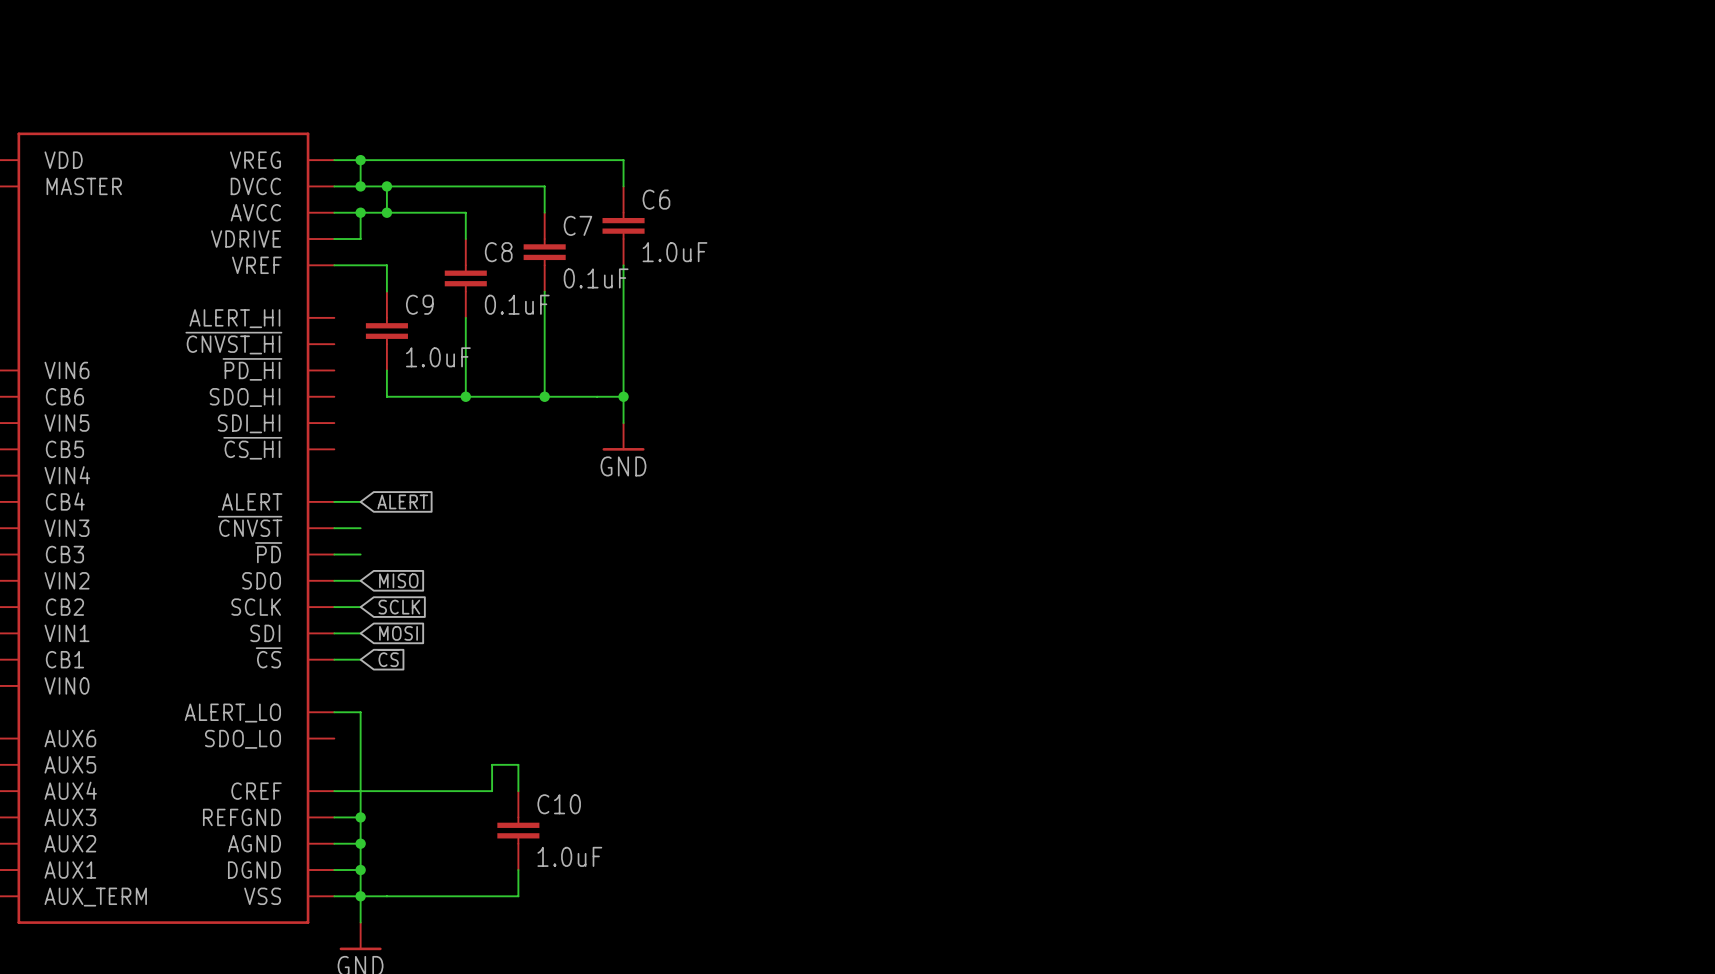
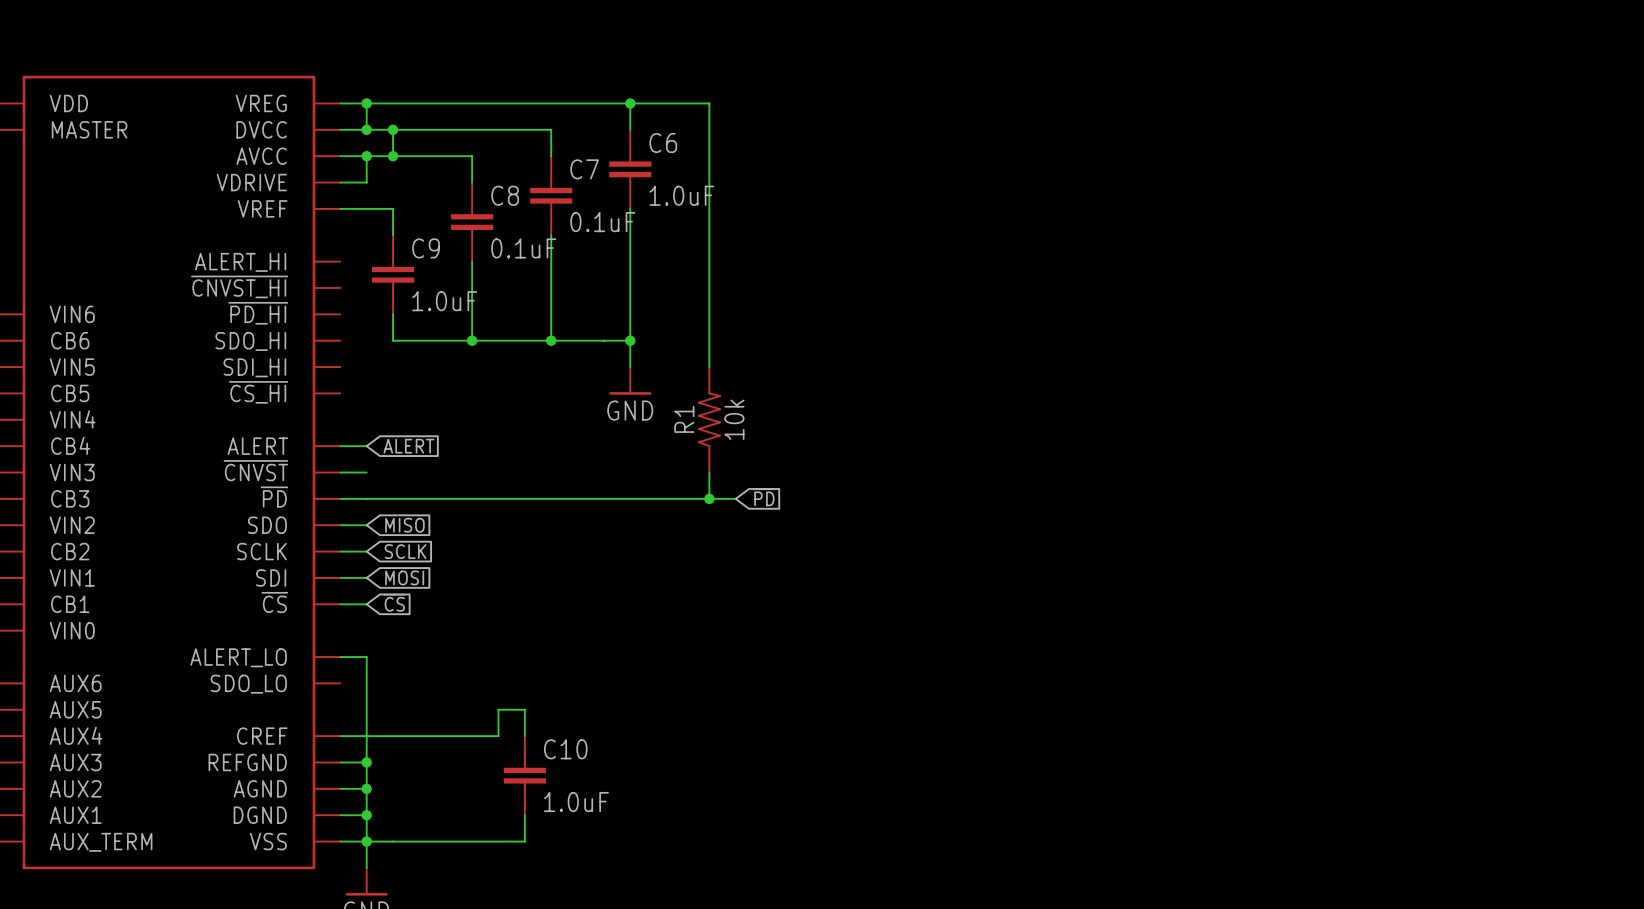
wire: none -> (630, 103) (709, 103) (709, 367)
junction: none -> (630, 103)
R1: none -> 10k (709, 419)
wire: none -> (709, 472) (709, 498)
global label: none -> ~{PD} (764, 497)
wire: none -> (366, 498) (735, 498)
junction: none -> (709, 498)

